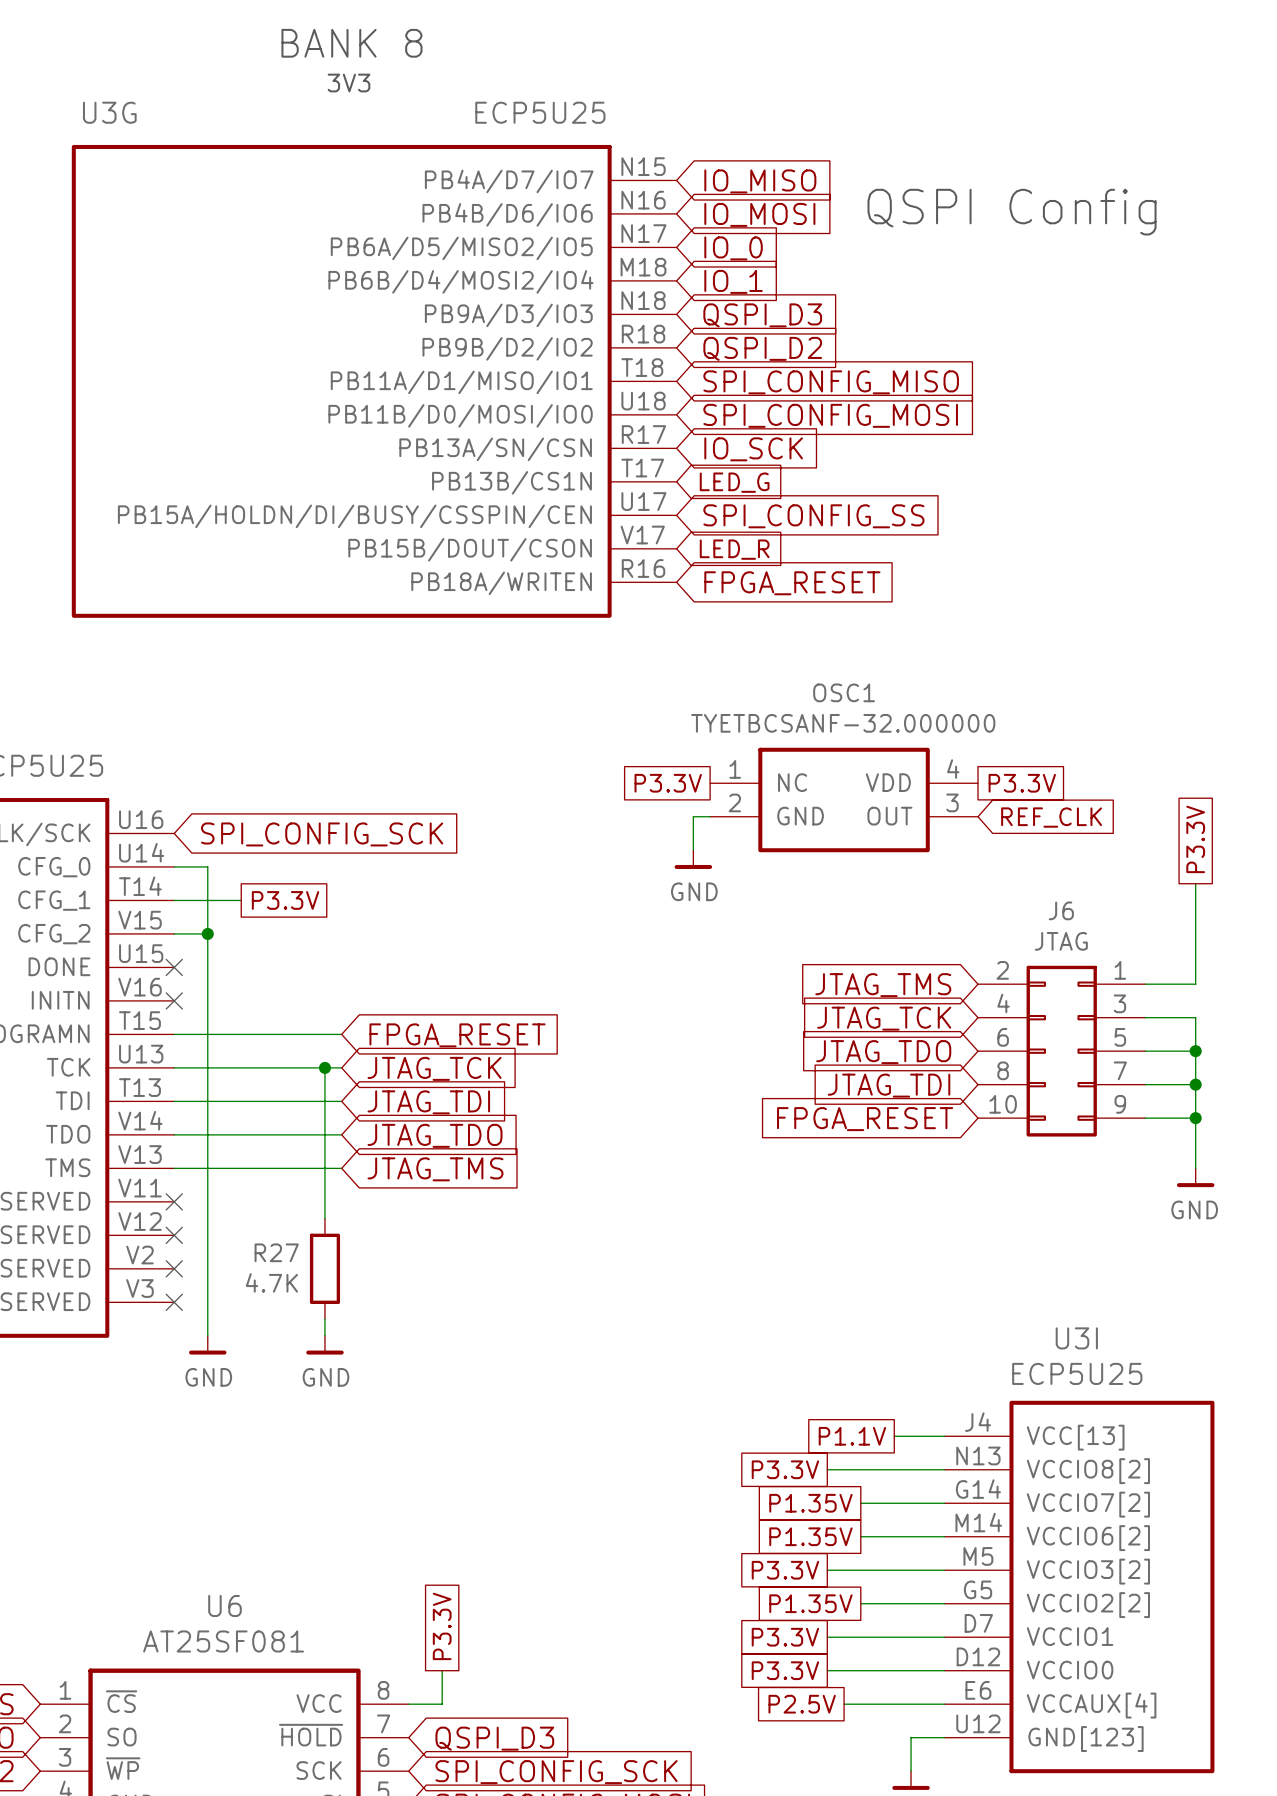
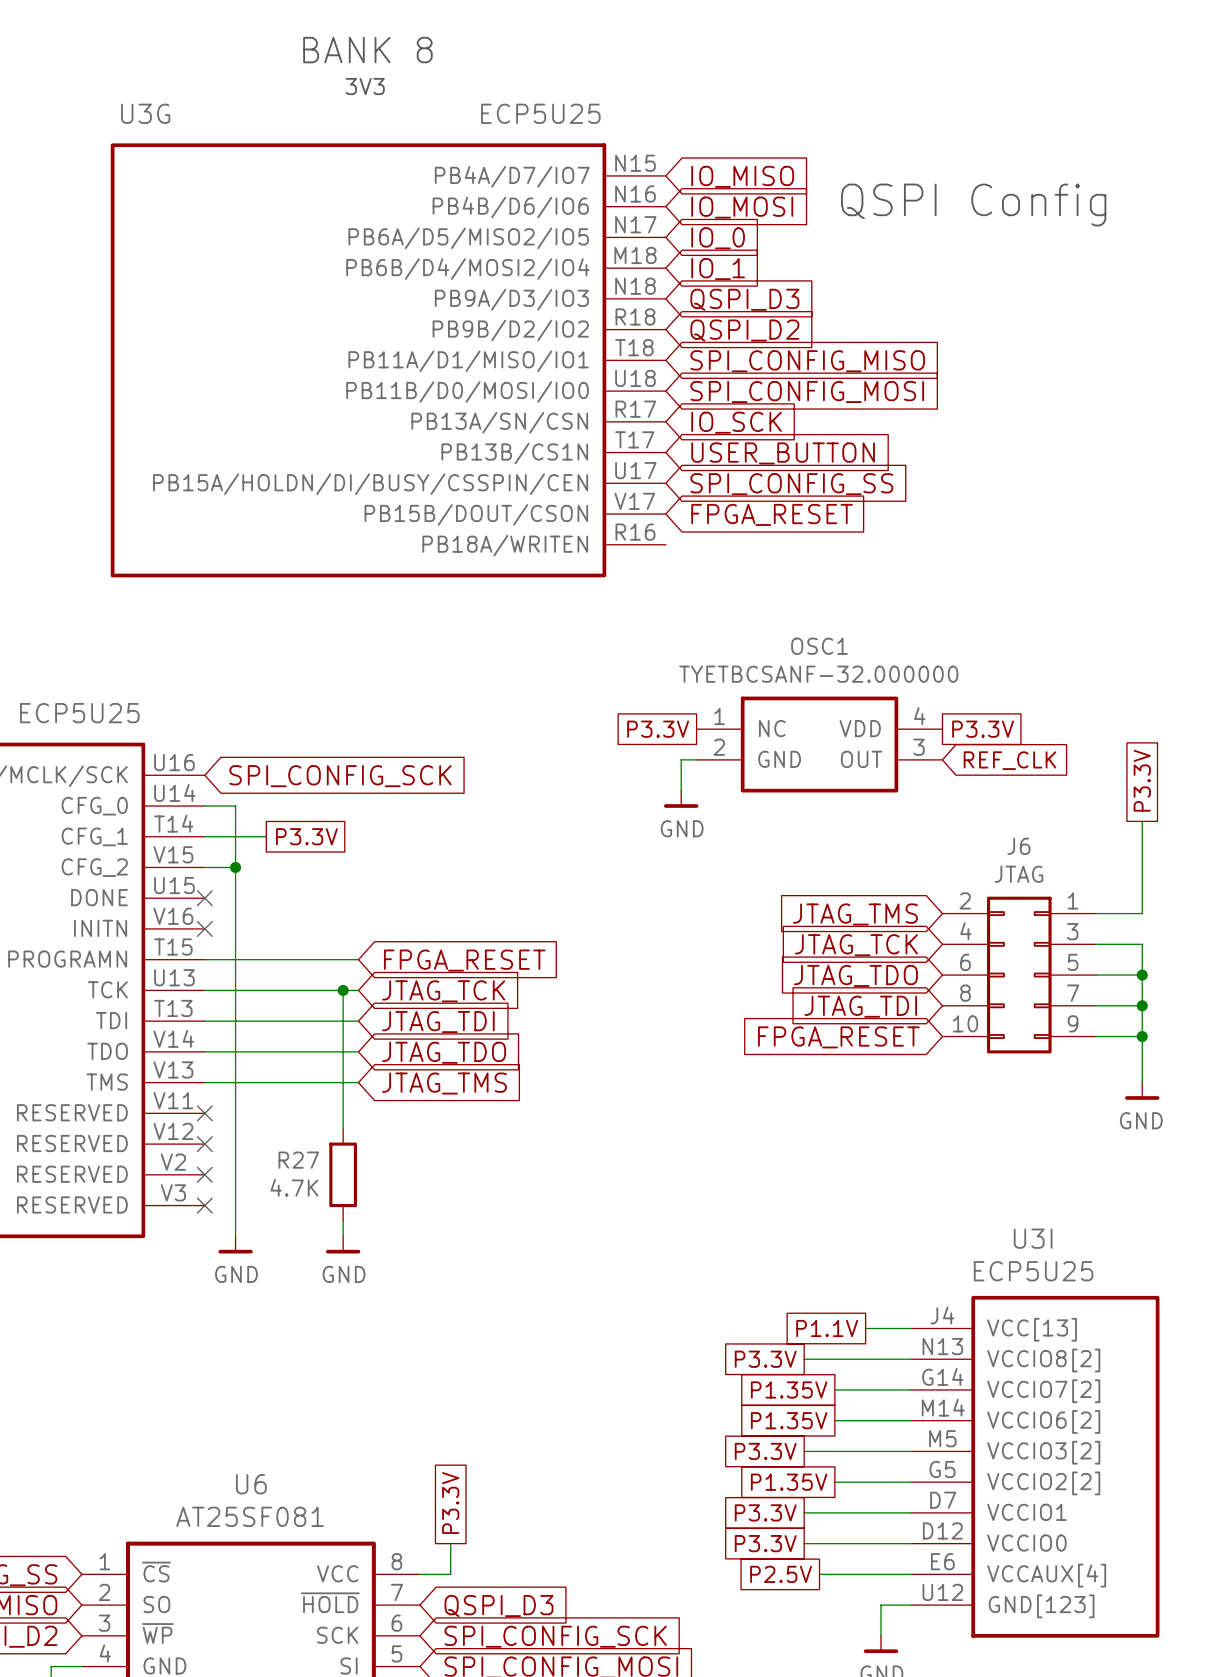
global label: LED_G (734, 482) -> USER_BUTTON (783, 453)
global label: LED_R (734, 549) -> FPGA_RESET (772, 514)
global label: FPGA_RESET (792, 583) -> none

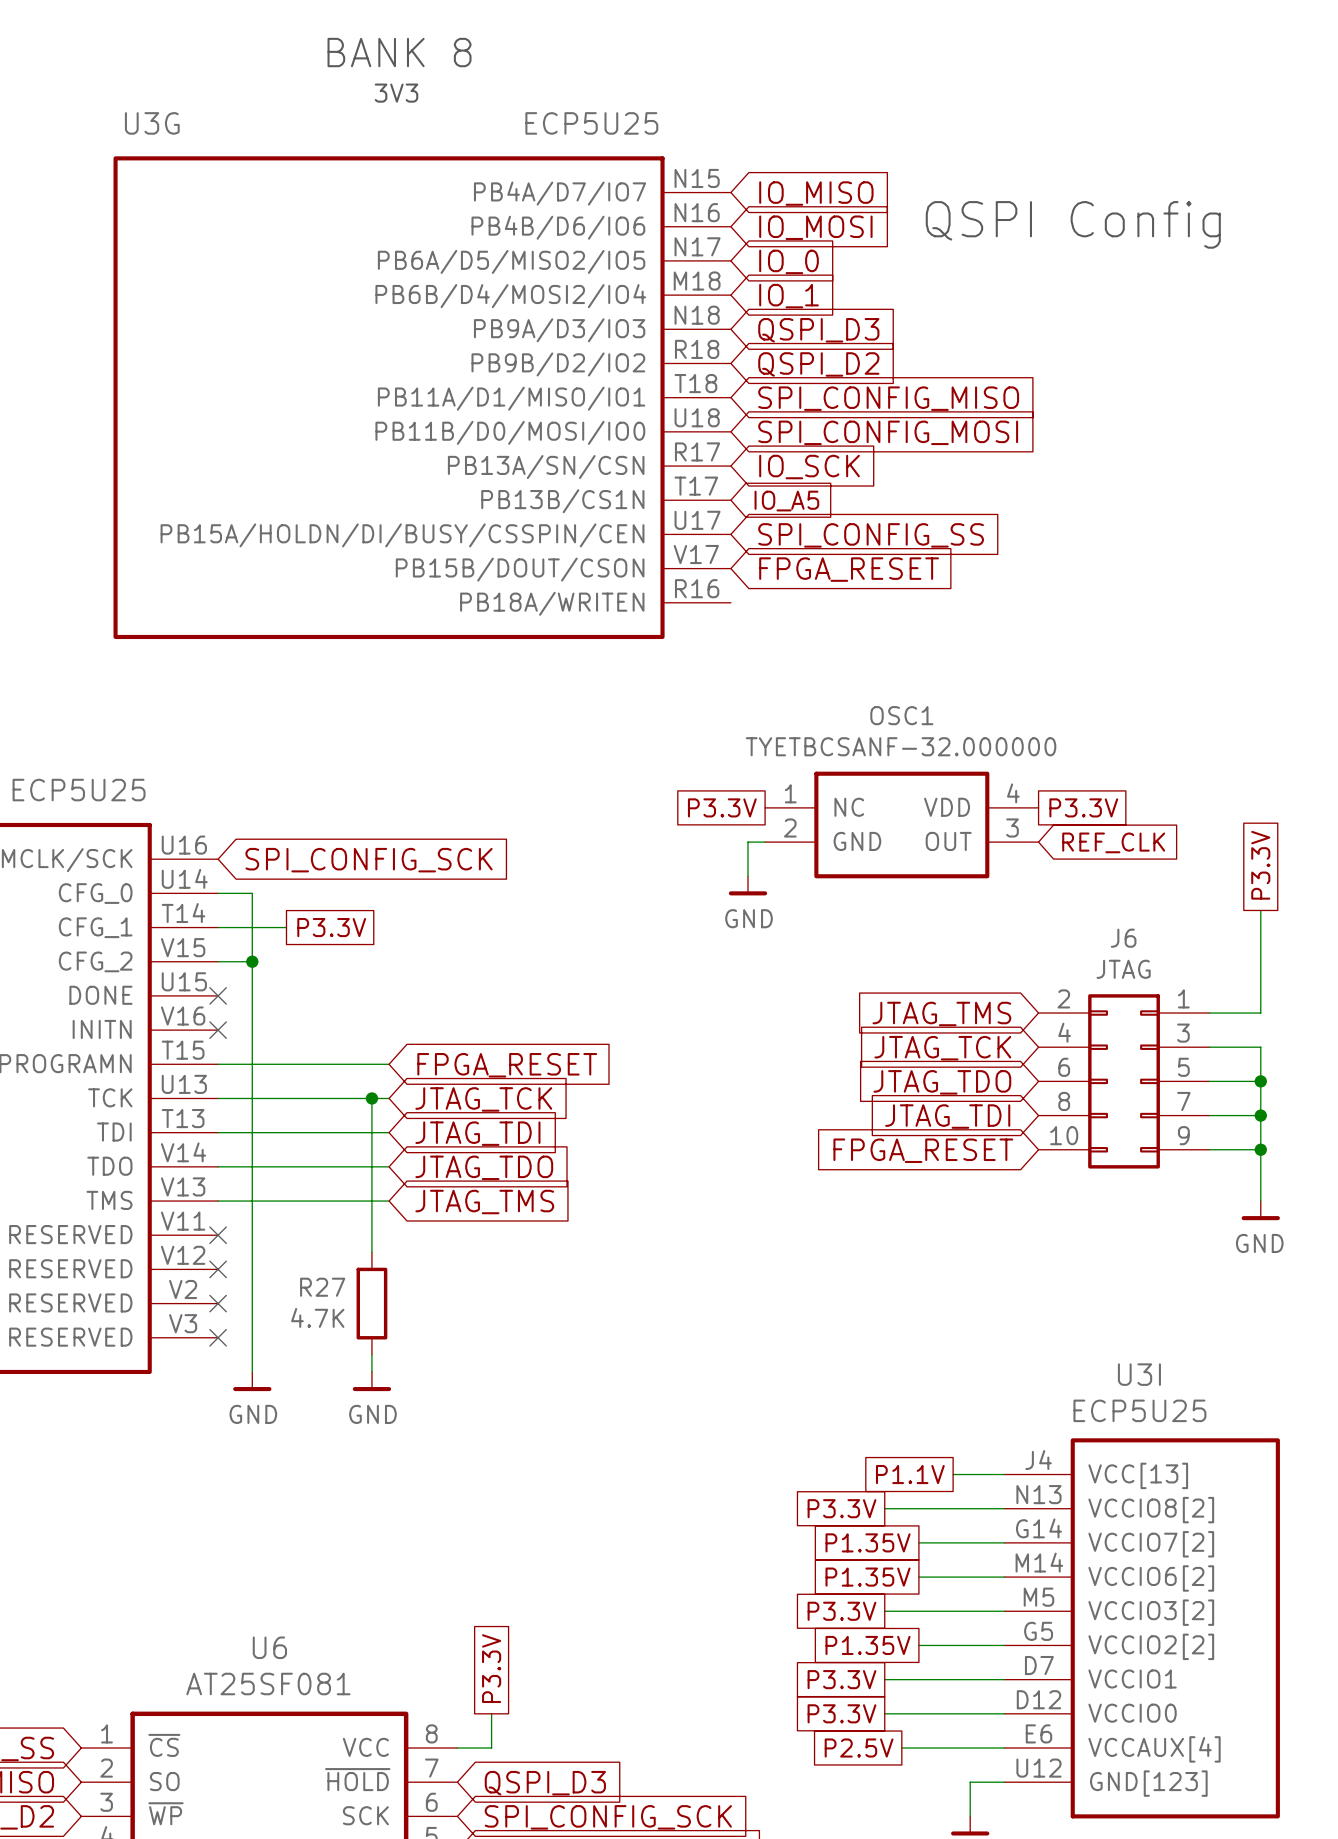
global label: USER_BUTTON (783, 453) -> IO_A5 (786, 501)

